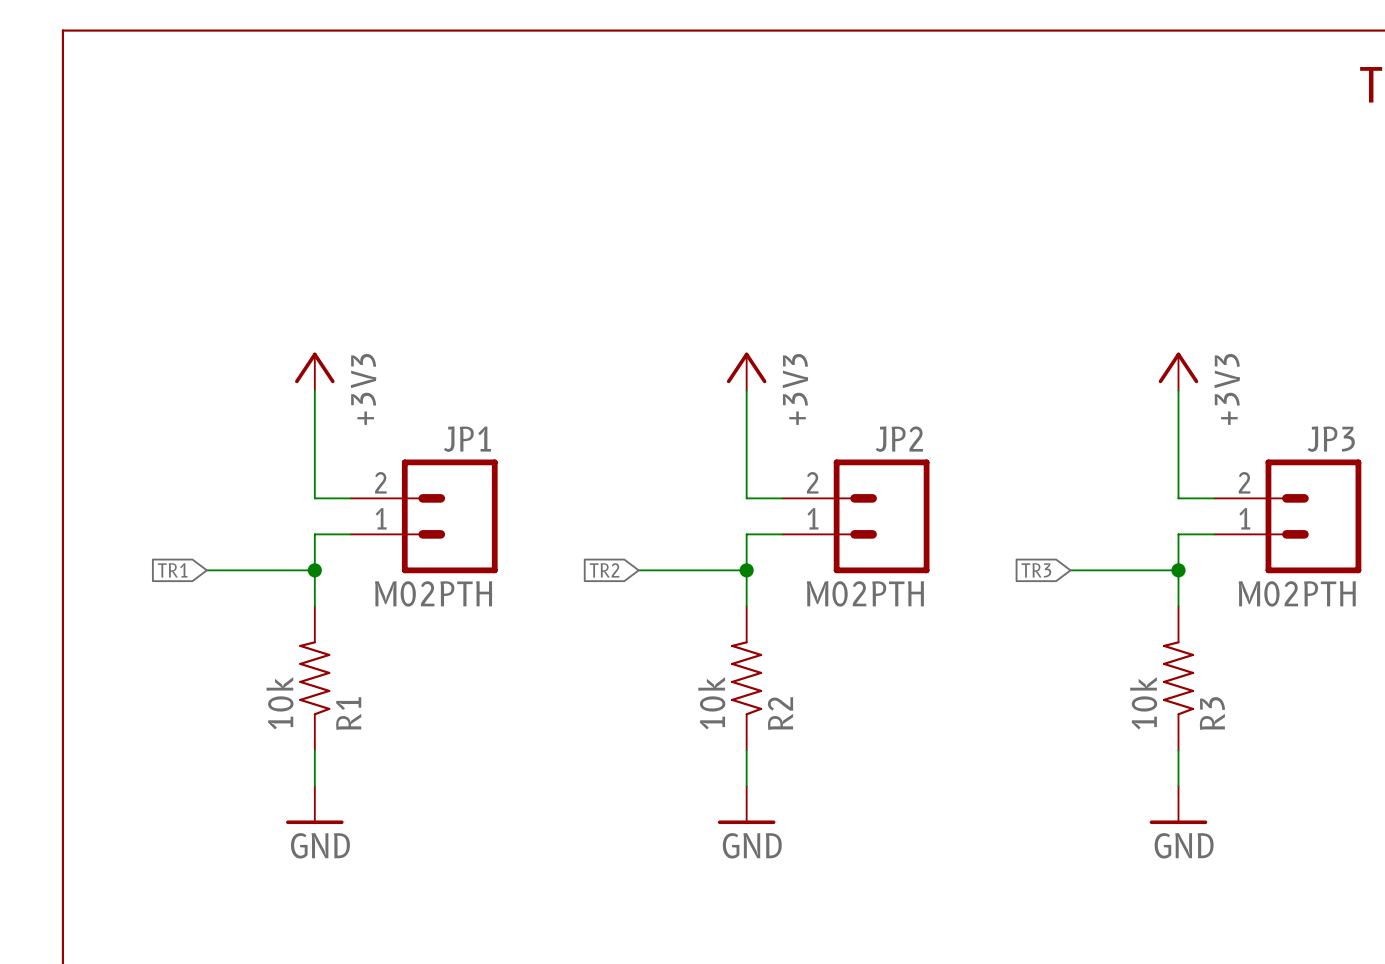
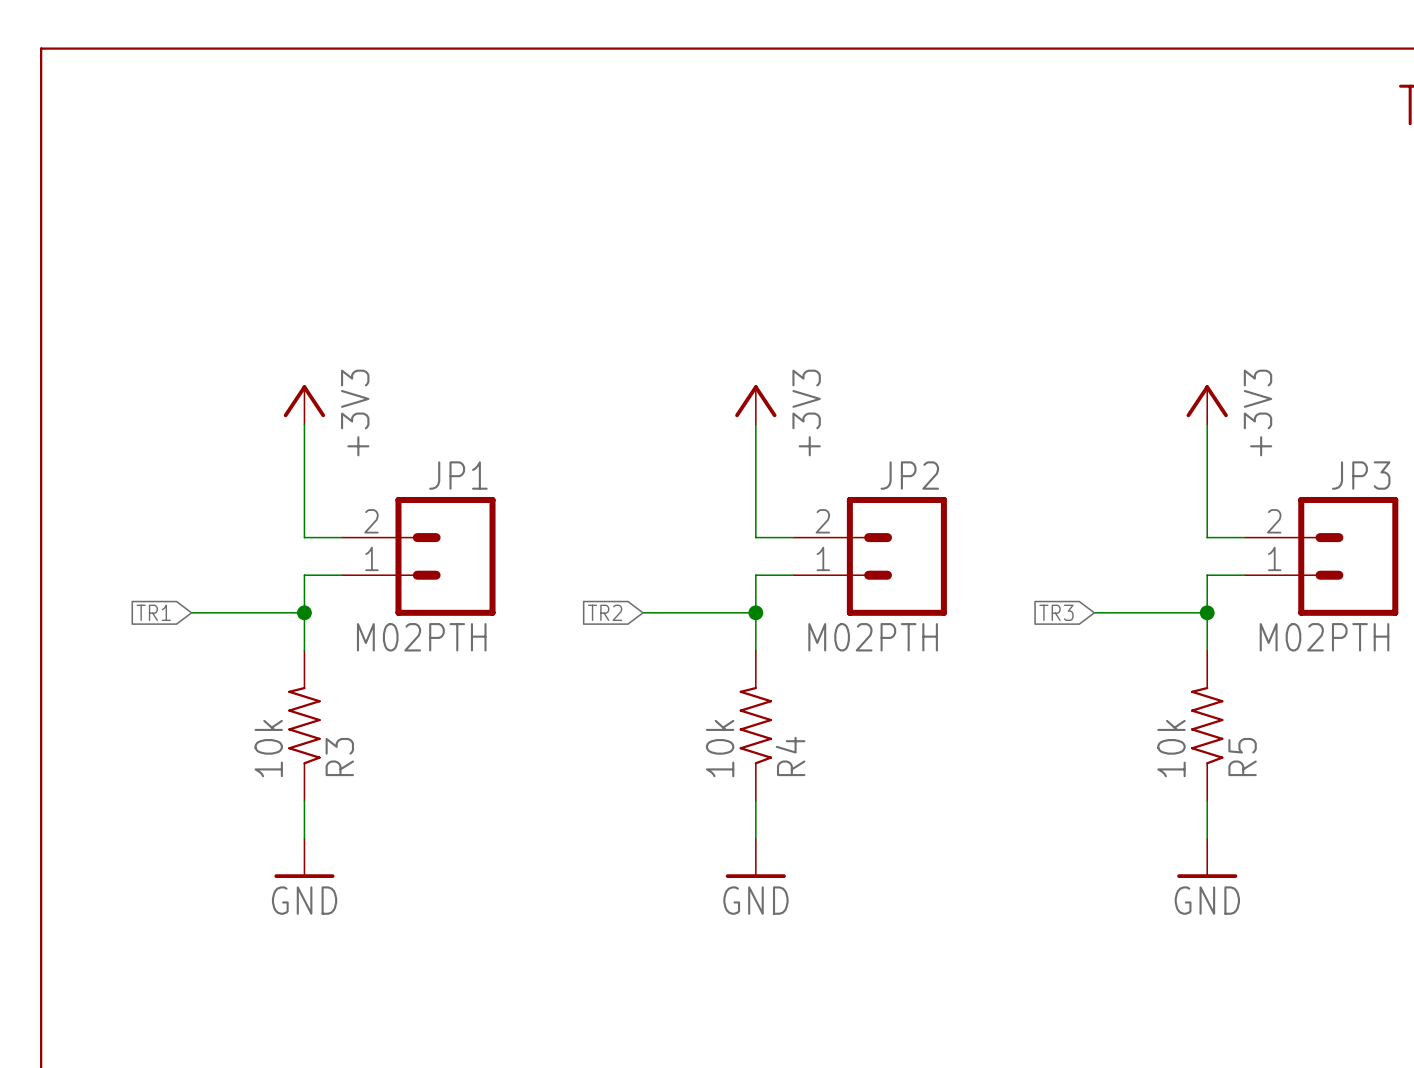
R1 name: R1 (348, 713) -> R3 (339, 757)
R2 name: R2 (780, 713) -> R4 (790, 756)
R3 name: R3 (1212, 713) -> R5 (1242, 757)

